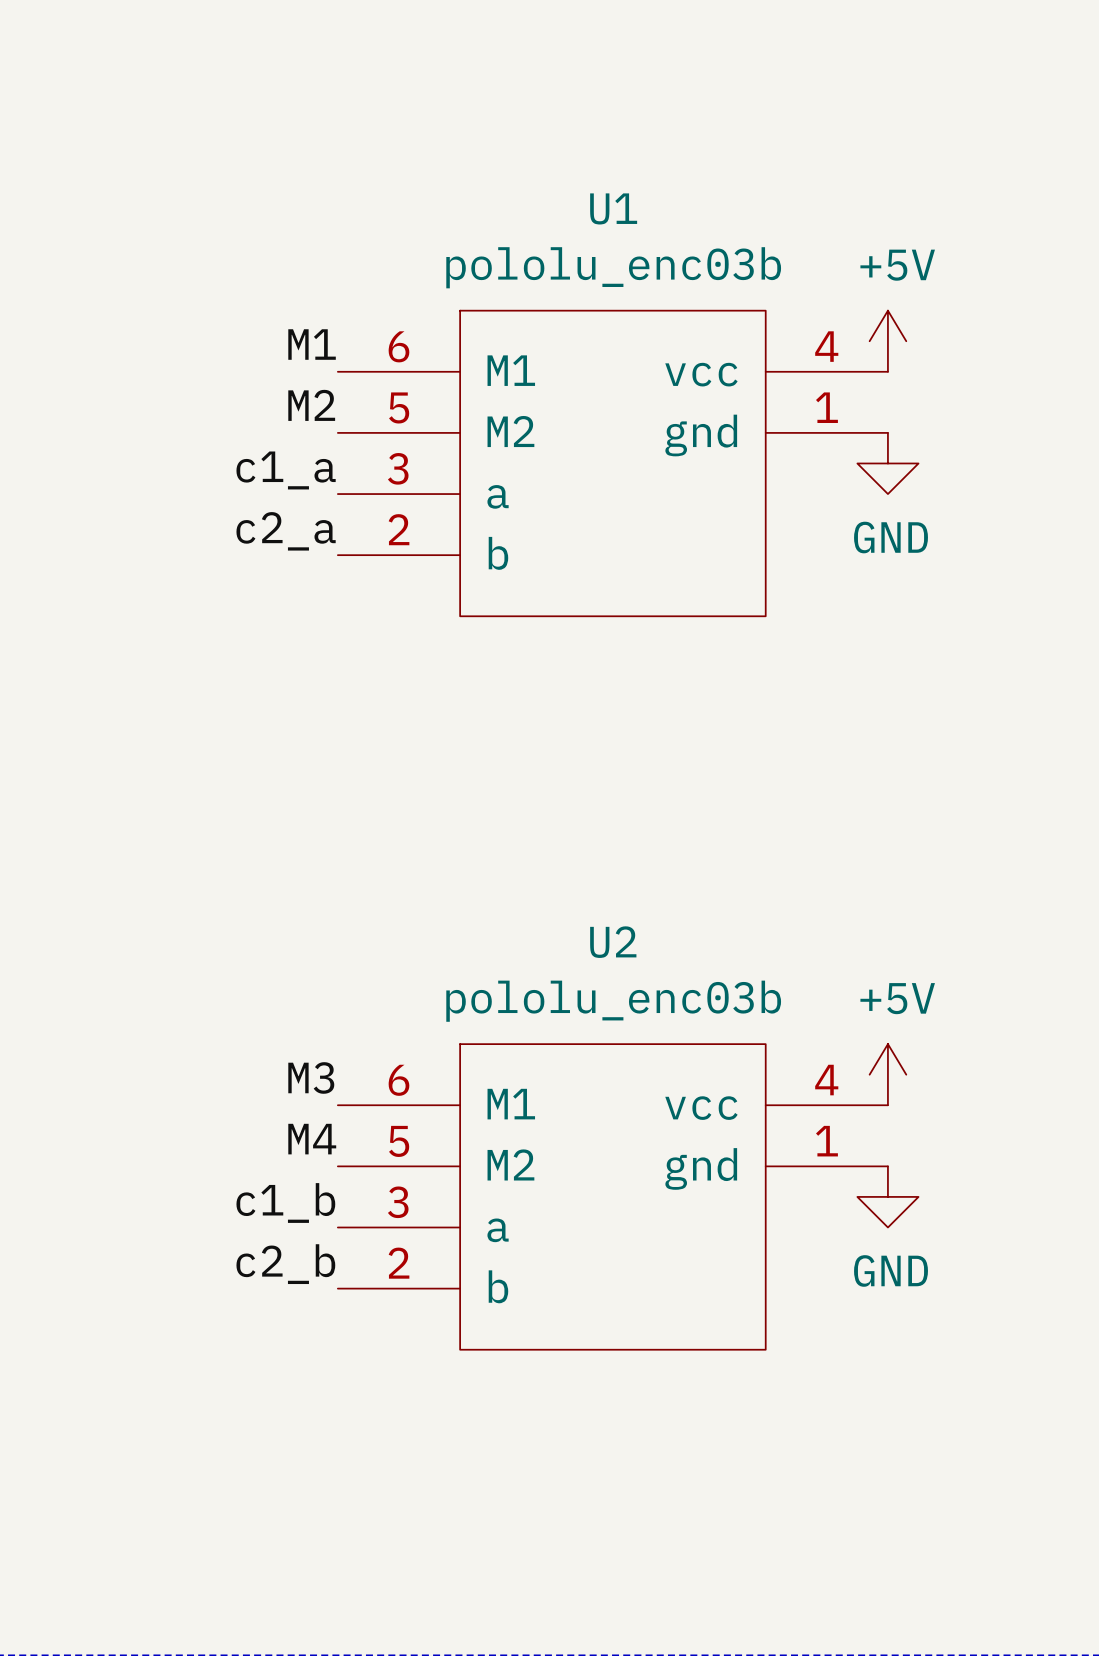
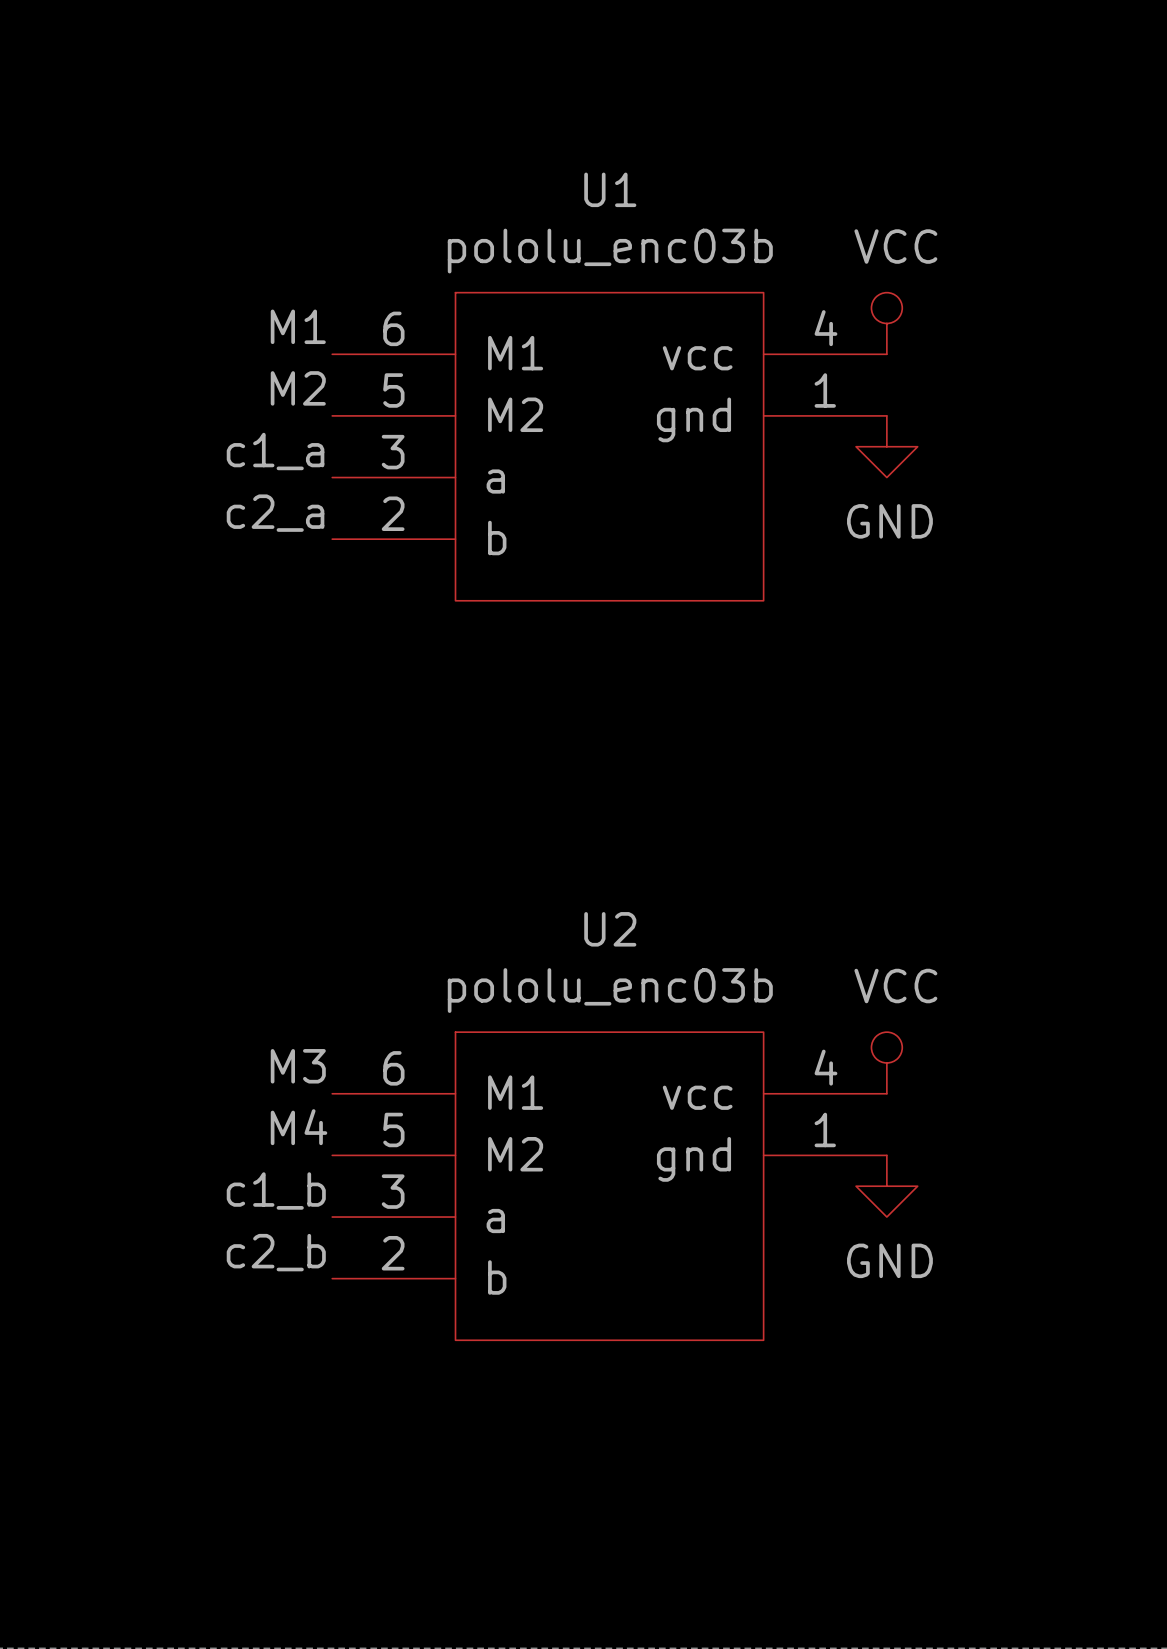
power symbol: +5V (887, 341) -> VCC (886, 323)
power symbol: +5V (887, 1074) -> VCC (886, 1062)

